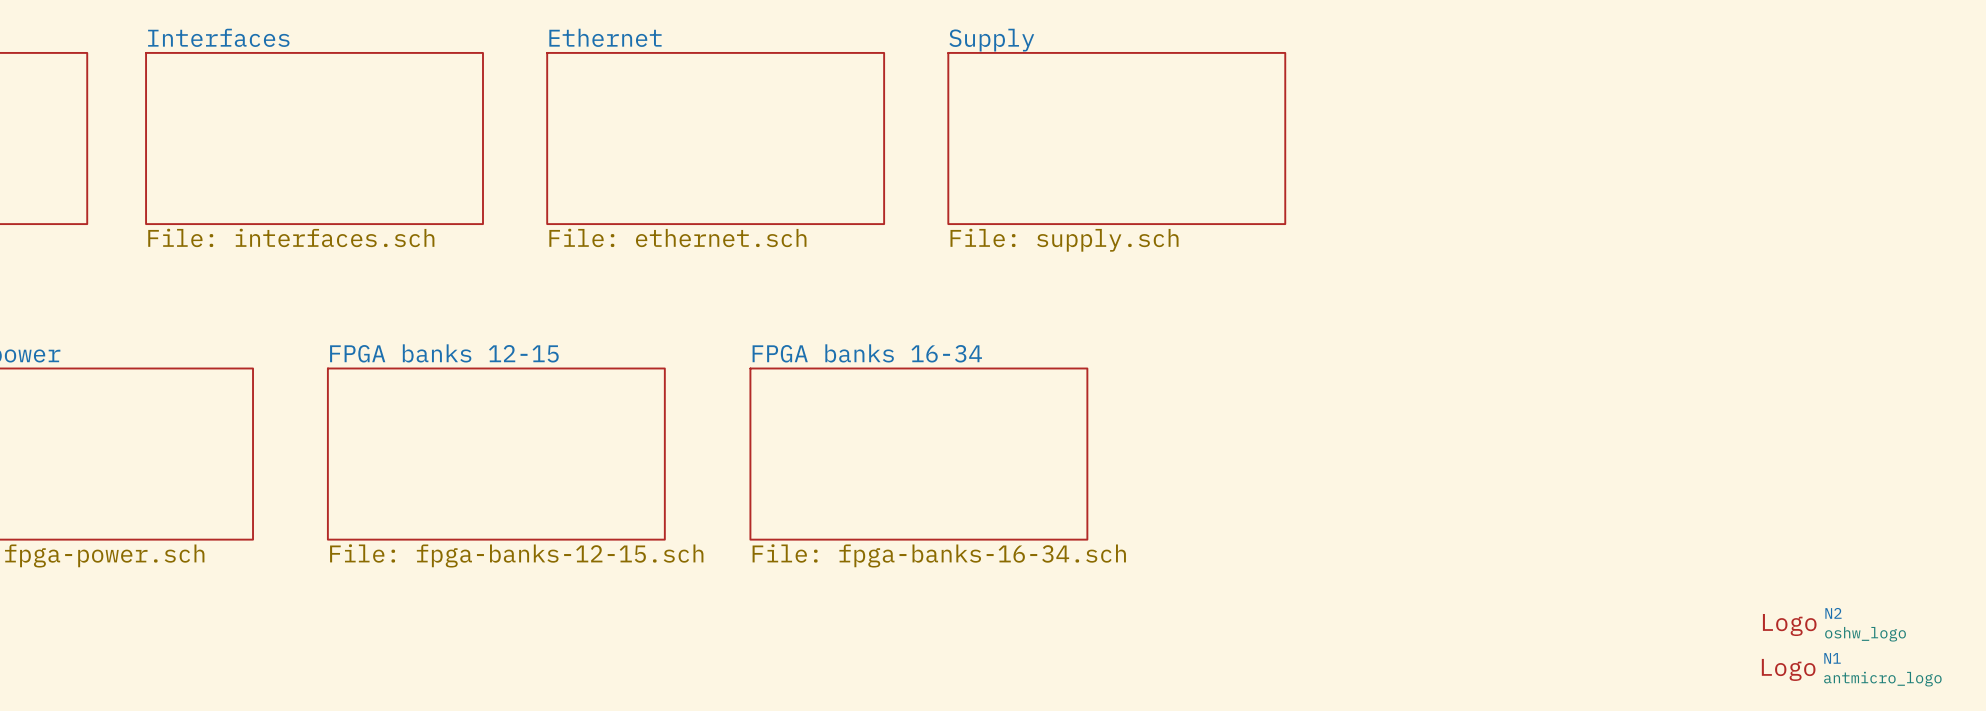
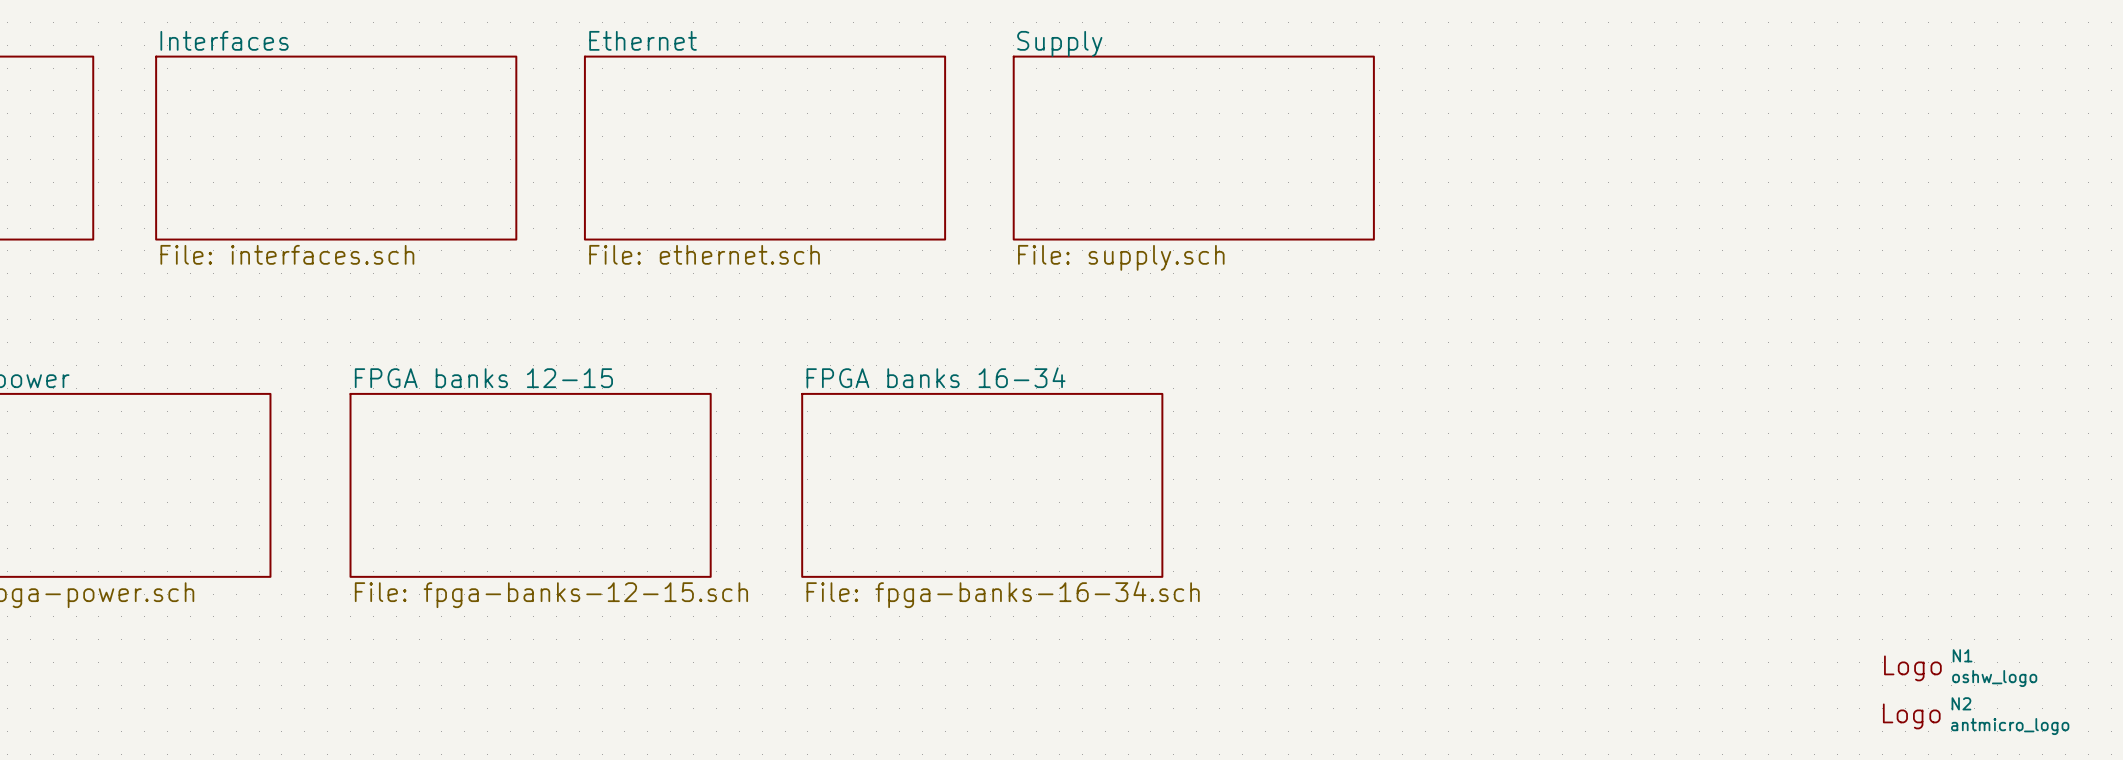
N2 name: N2 (1833, 613) -> N1 (1962, 655)
N1 name: N1 (1832, 658) -> N2 (1961, 703)

